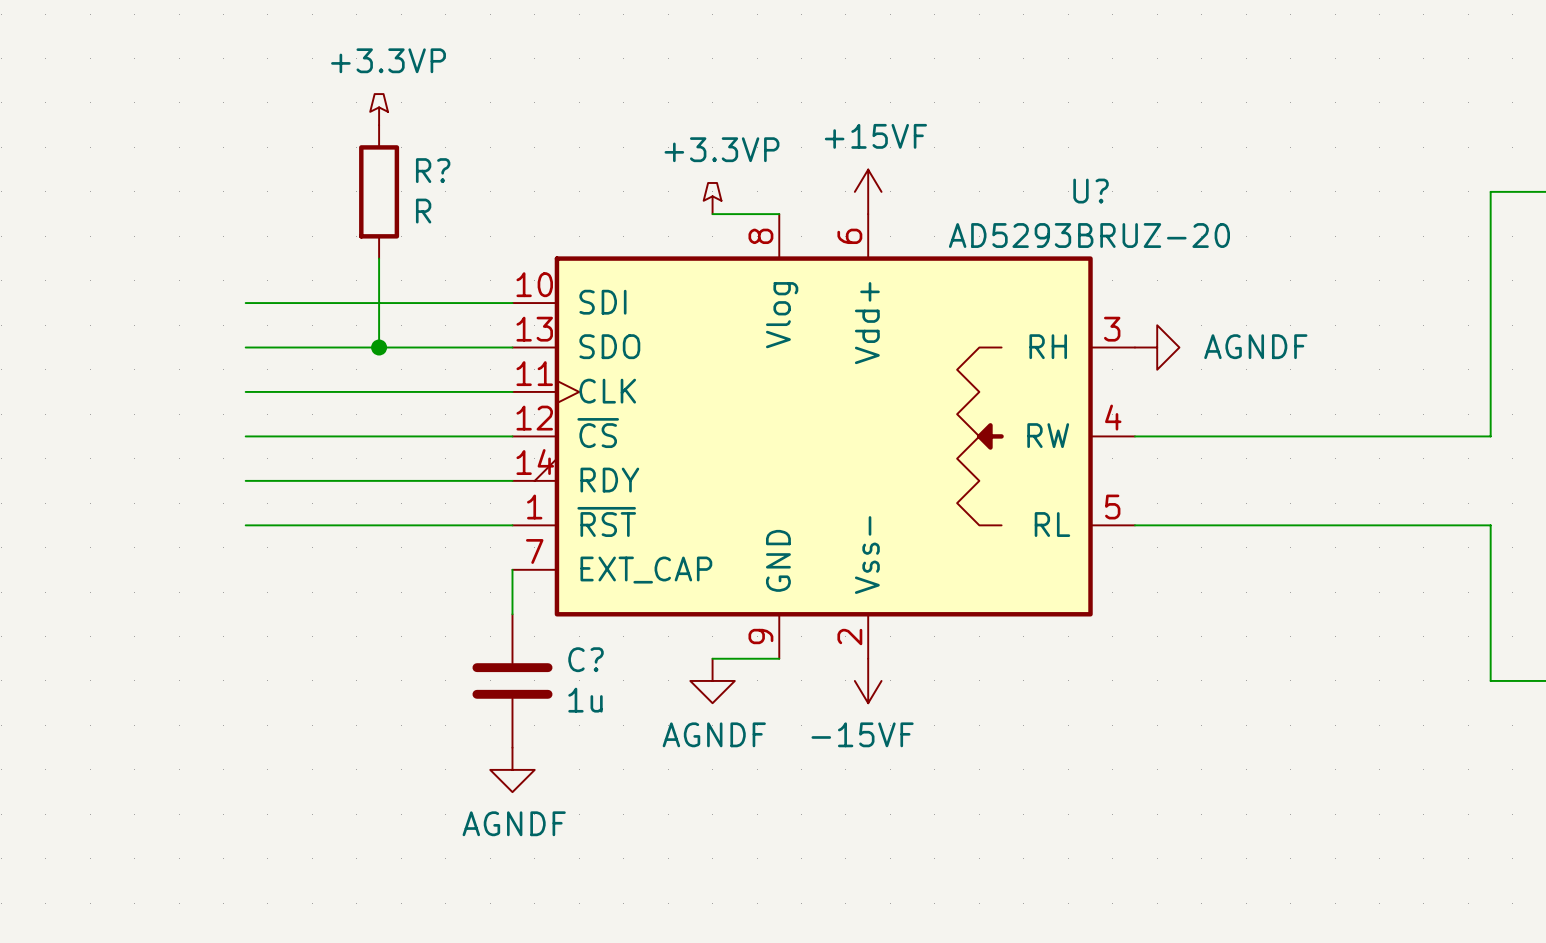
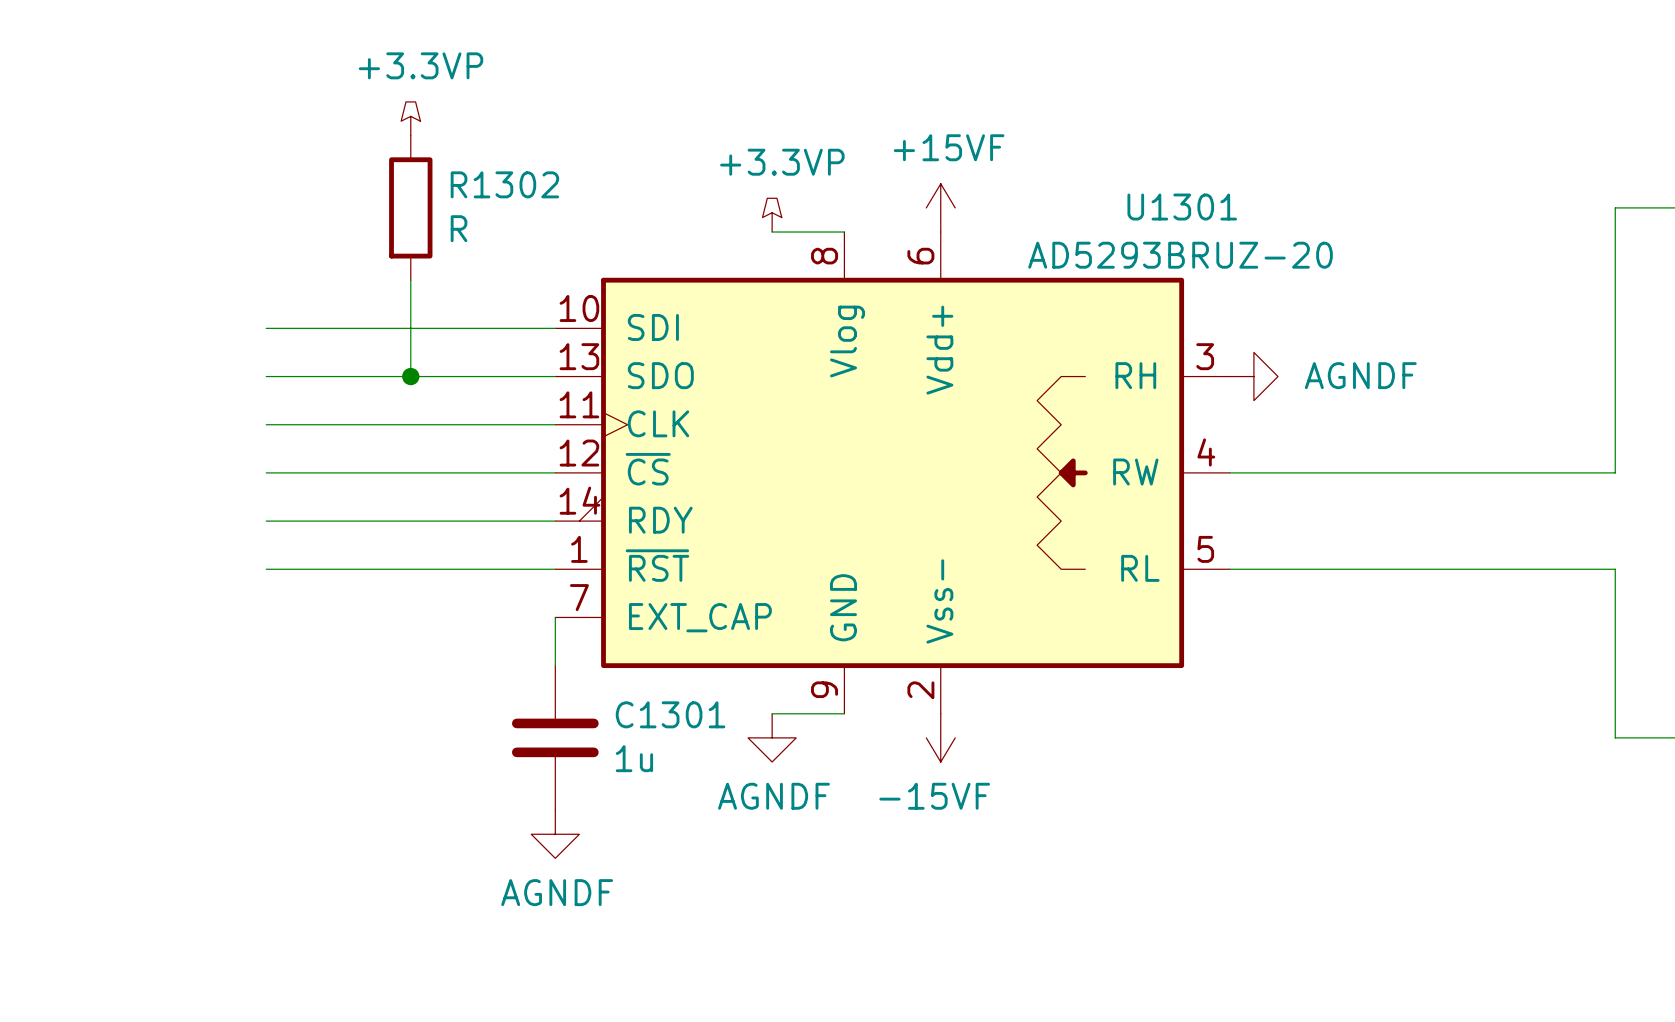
R? name: R? (433, 170) -> R1302 (504, 184)
U? name: U? (1091, 191) -> U1301 (1182, 207)
C? name: C? (586, 659) -> C1301 (670, 714)

